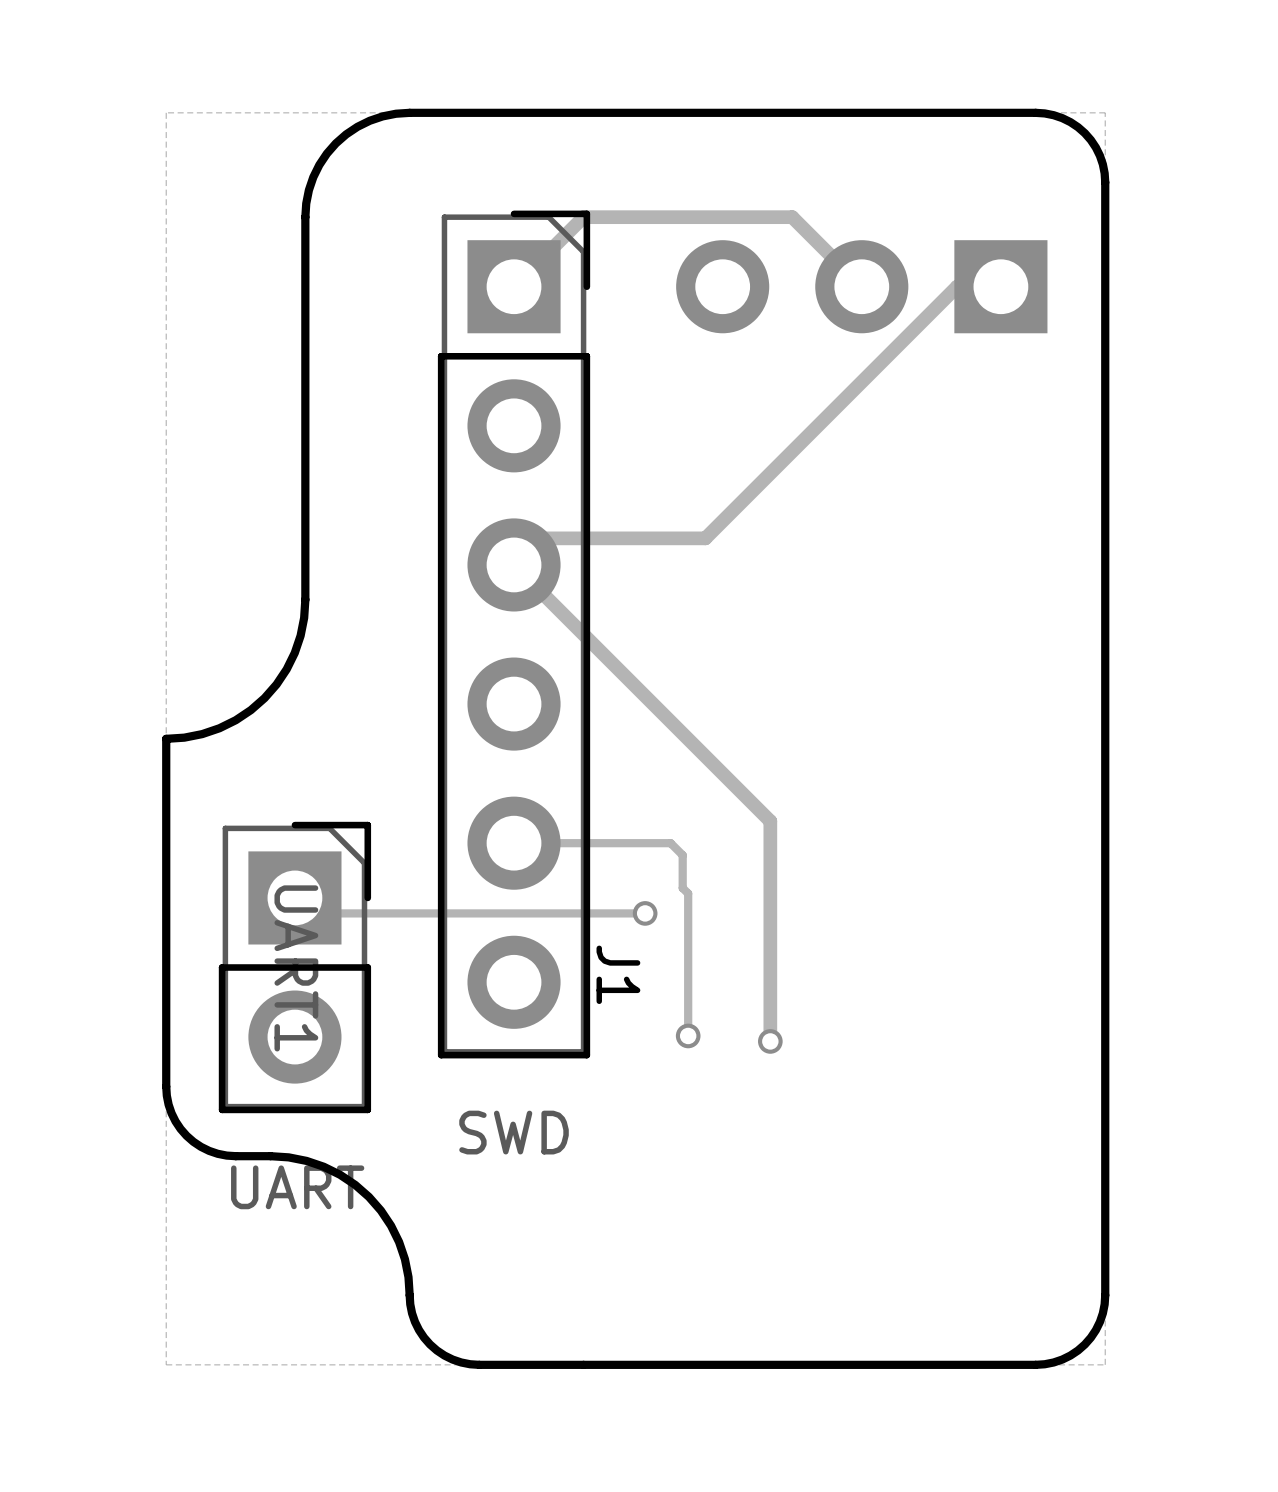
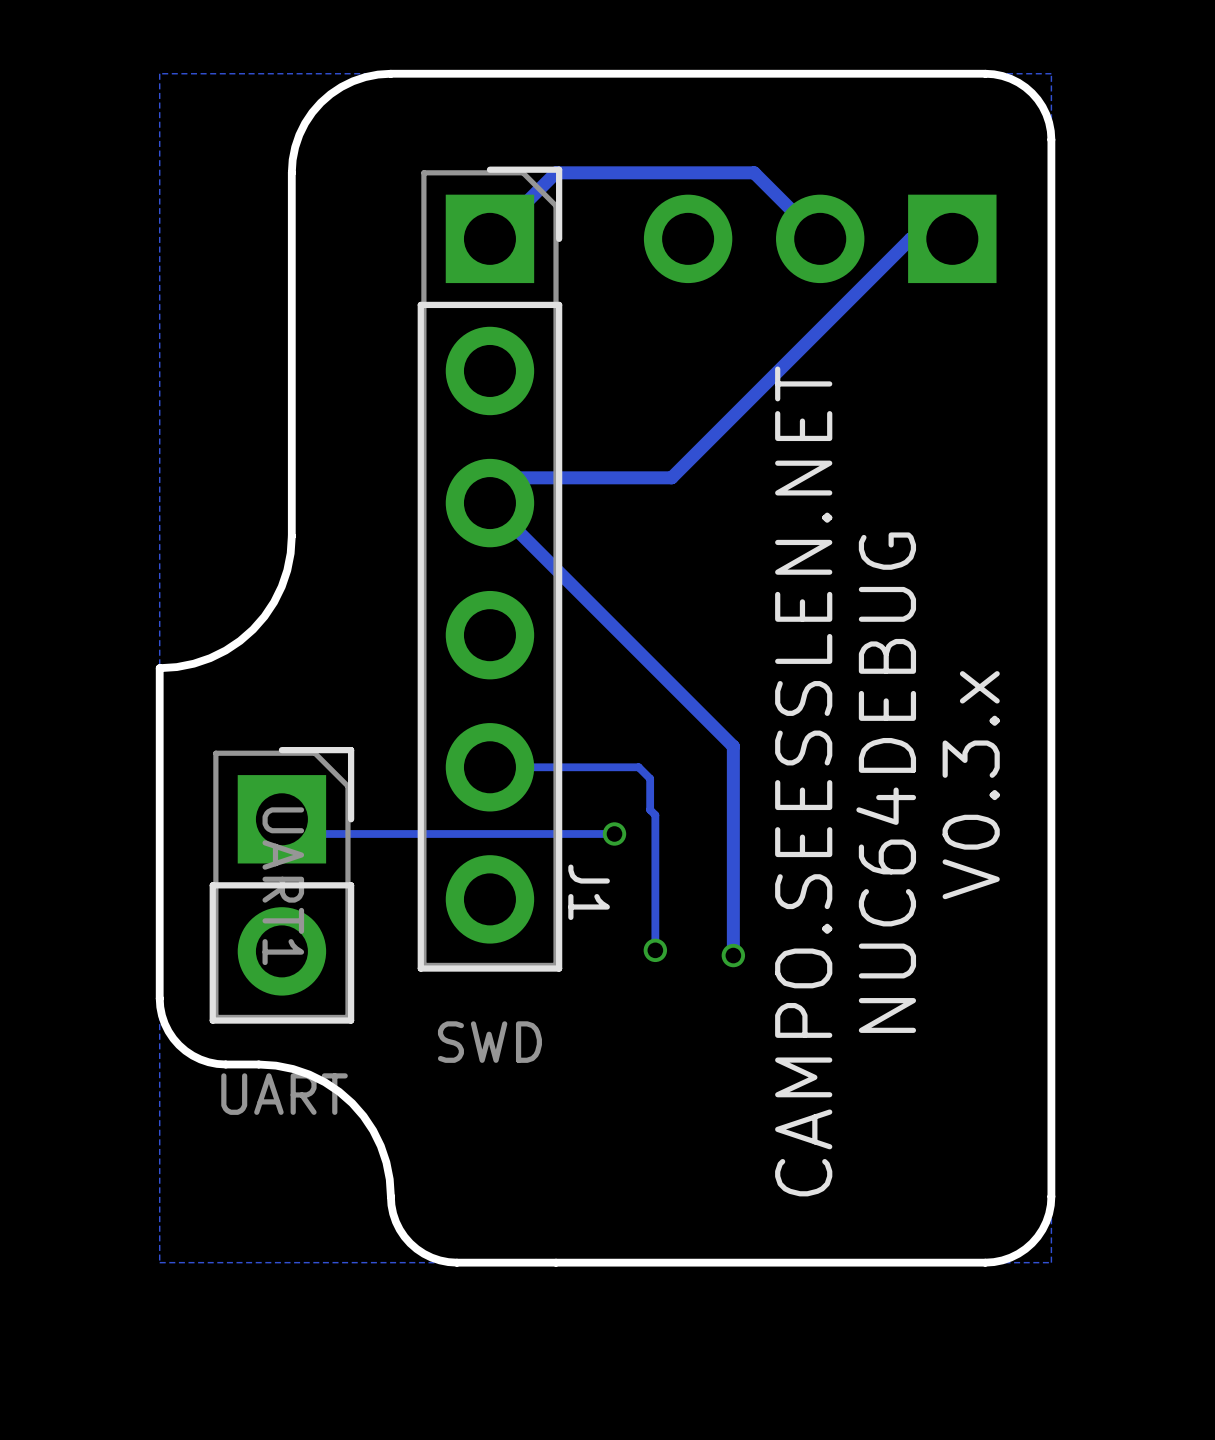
text: none -> CAMPO.SEESSLEN.NET (803, 781)
text: none -> NUC64DEBUG (886, 782)
text: none -> V0.3.x (971, 785)

